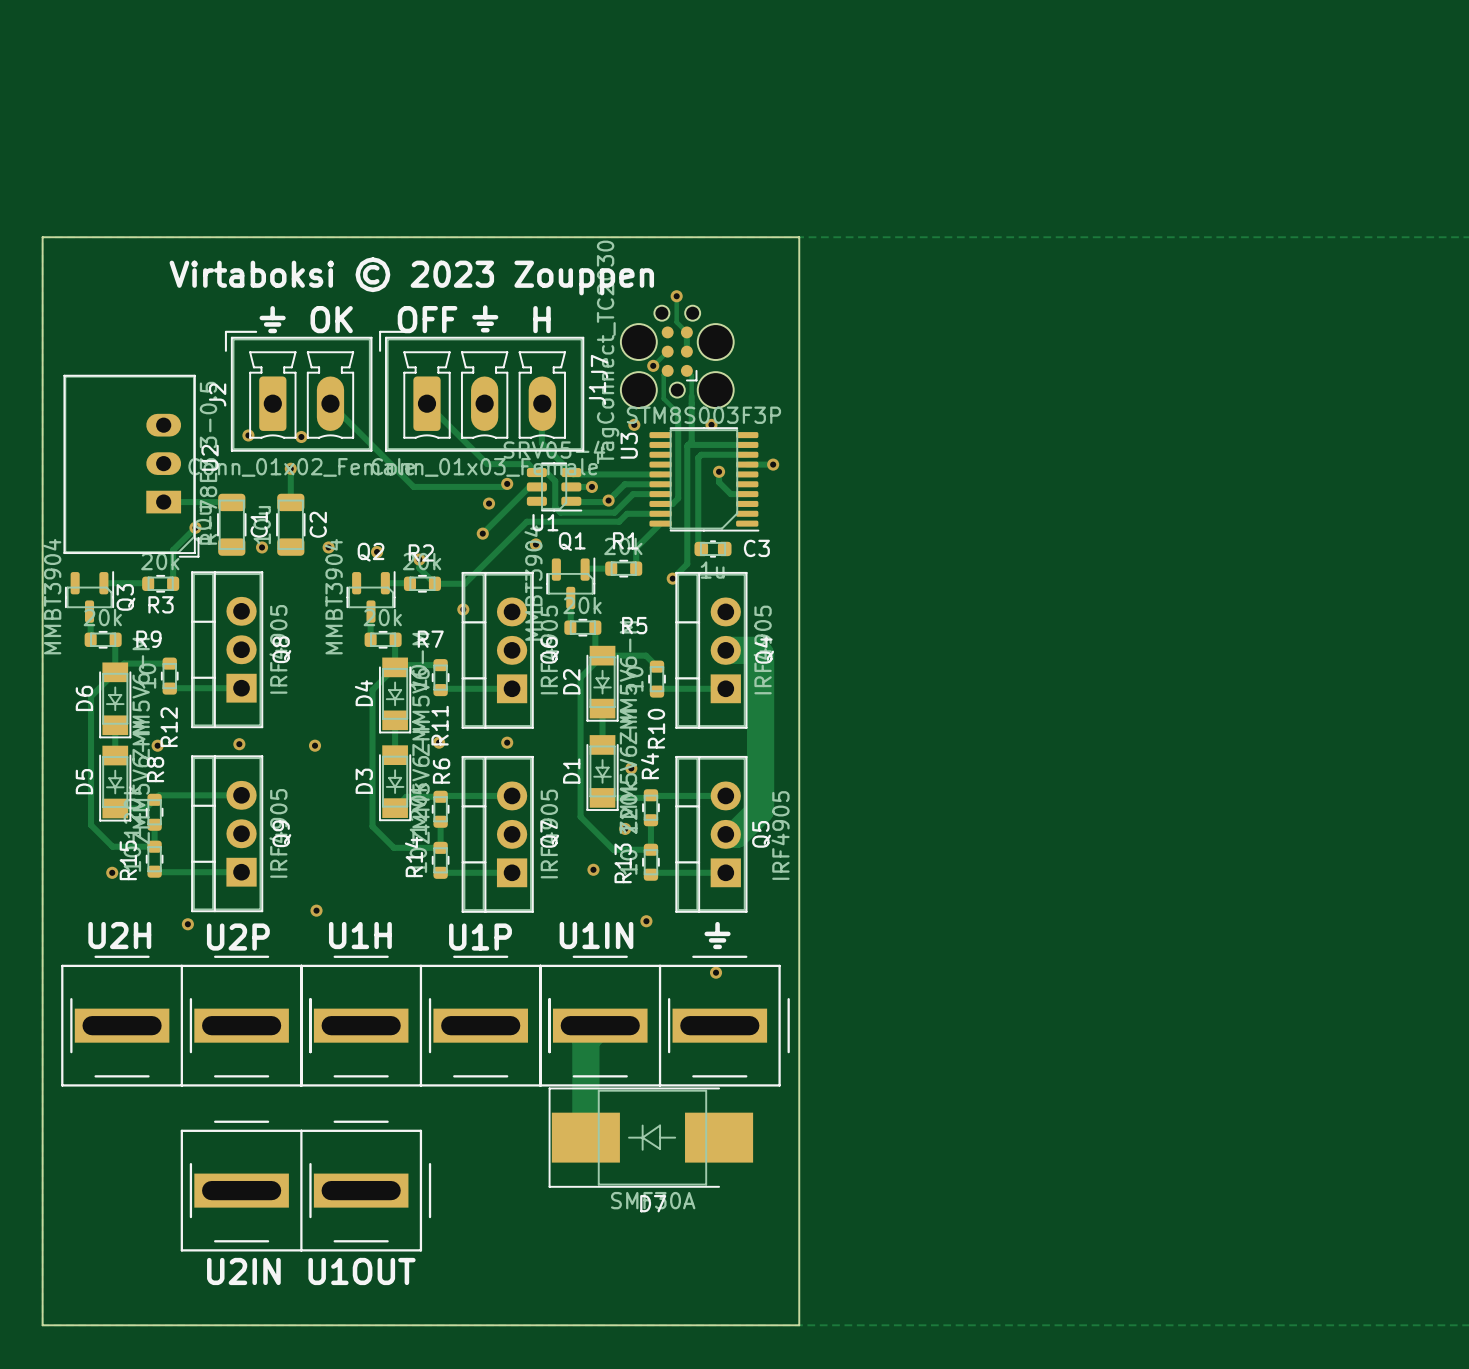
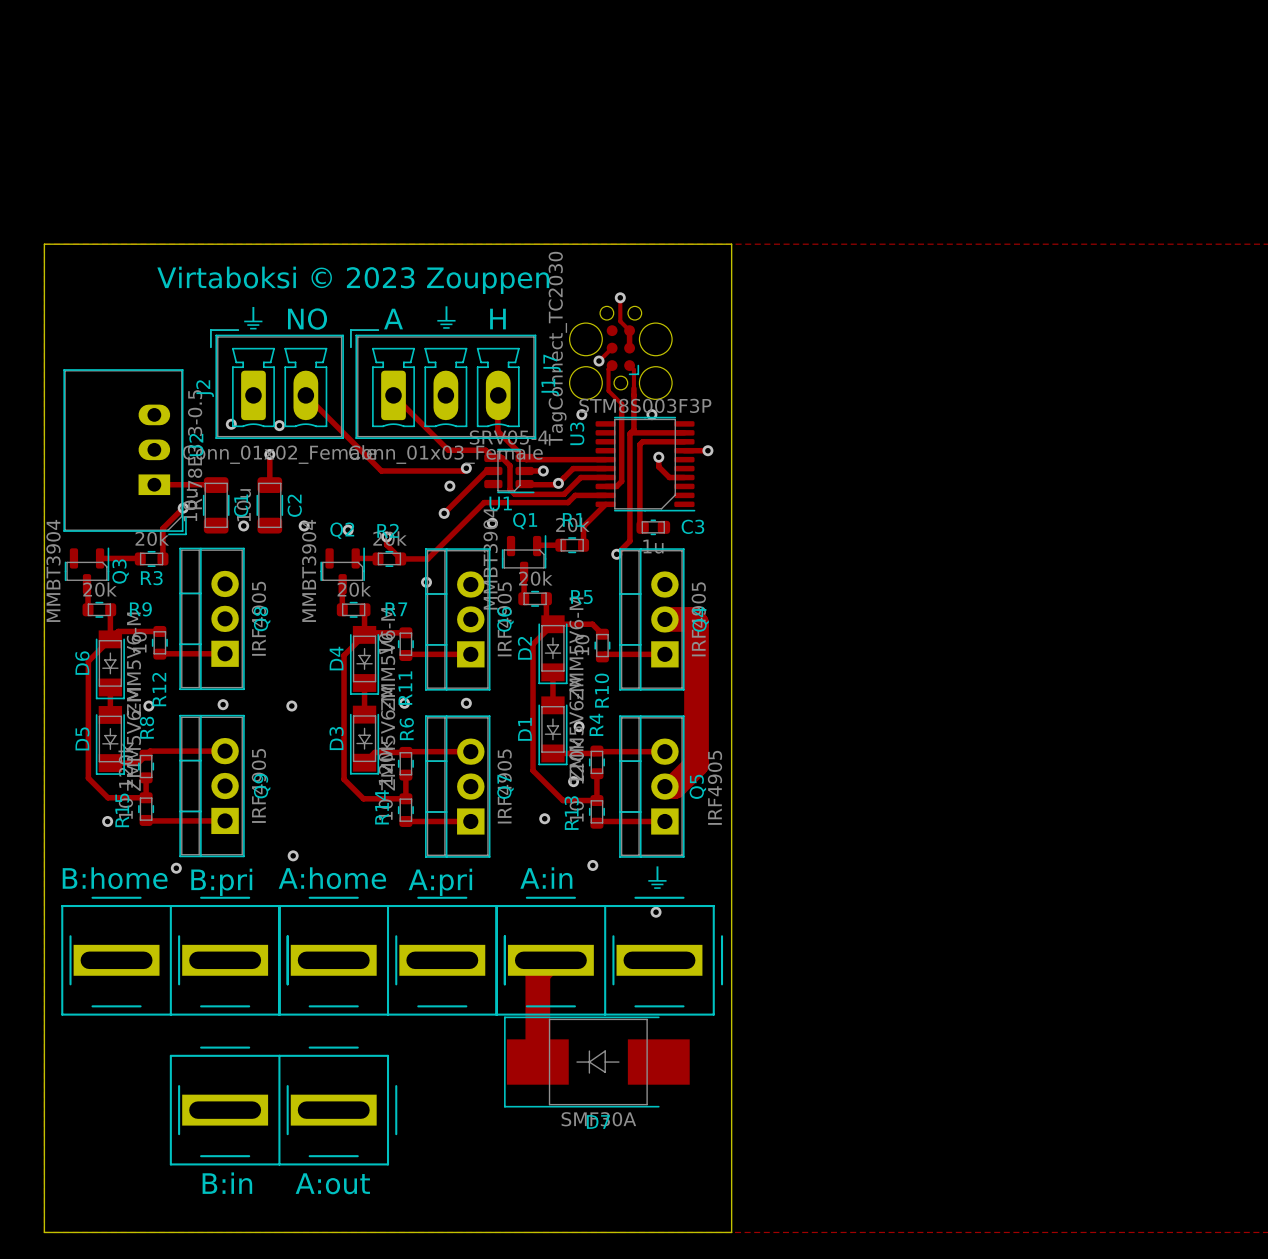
text: OK (331, 319) -> NO (307, 319)
text: OFF (427, 319) -> A (393, 319)
text: U2H (119, 935) -> B:home (115, 878)
text: U1H (360, 935) -> A:home (332, 878)
text: U1IN (596, 935) -> A:in (546, 878)
text: U2P (238, 937) -> B:pri (221, 882)
text: U1P (480, 937) -> A:pri (440, 882)
text: U2IN (243, 1271) -> B:in (227, 1183)
text: U1OUT (362, 1271) -> A:out (332, 1183)

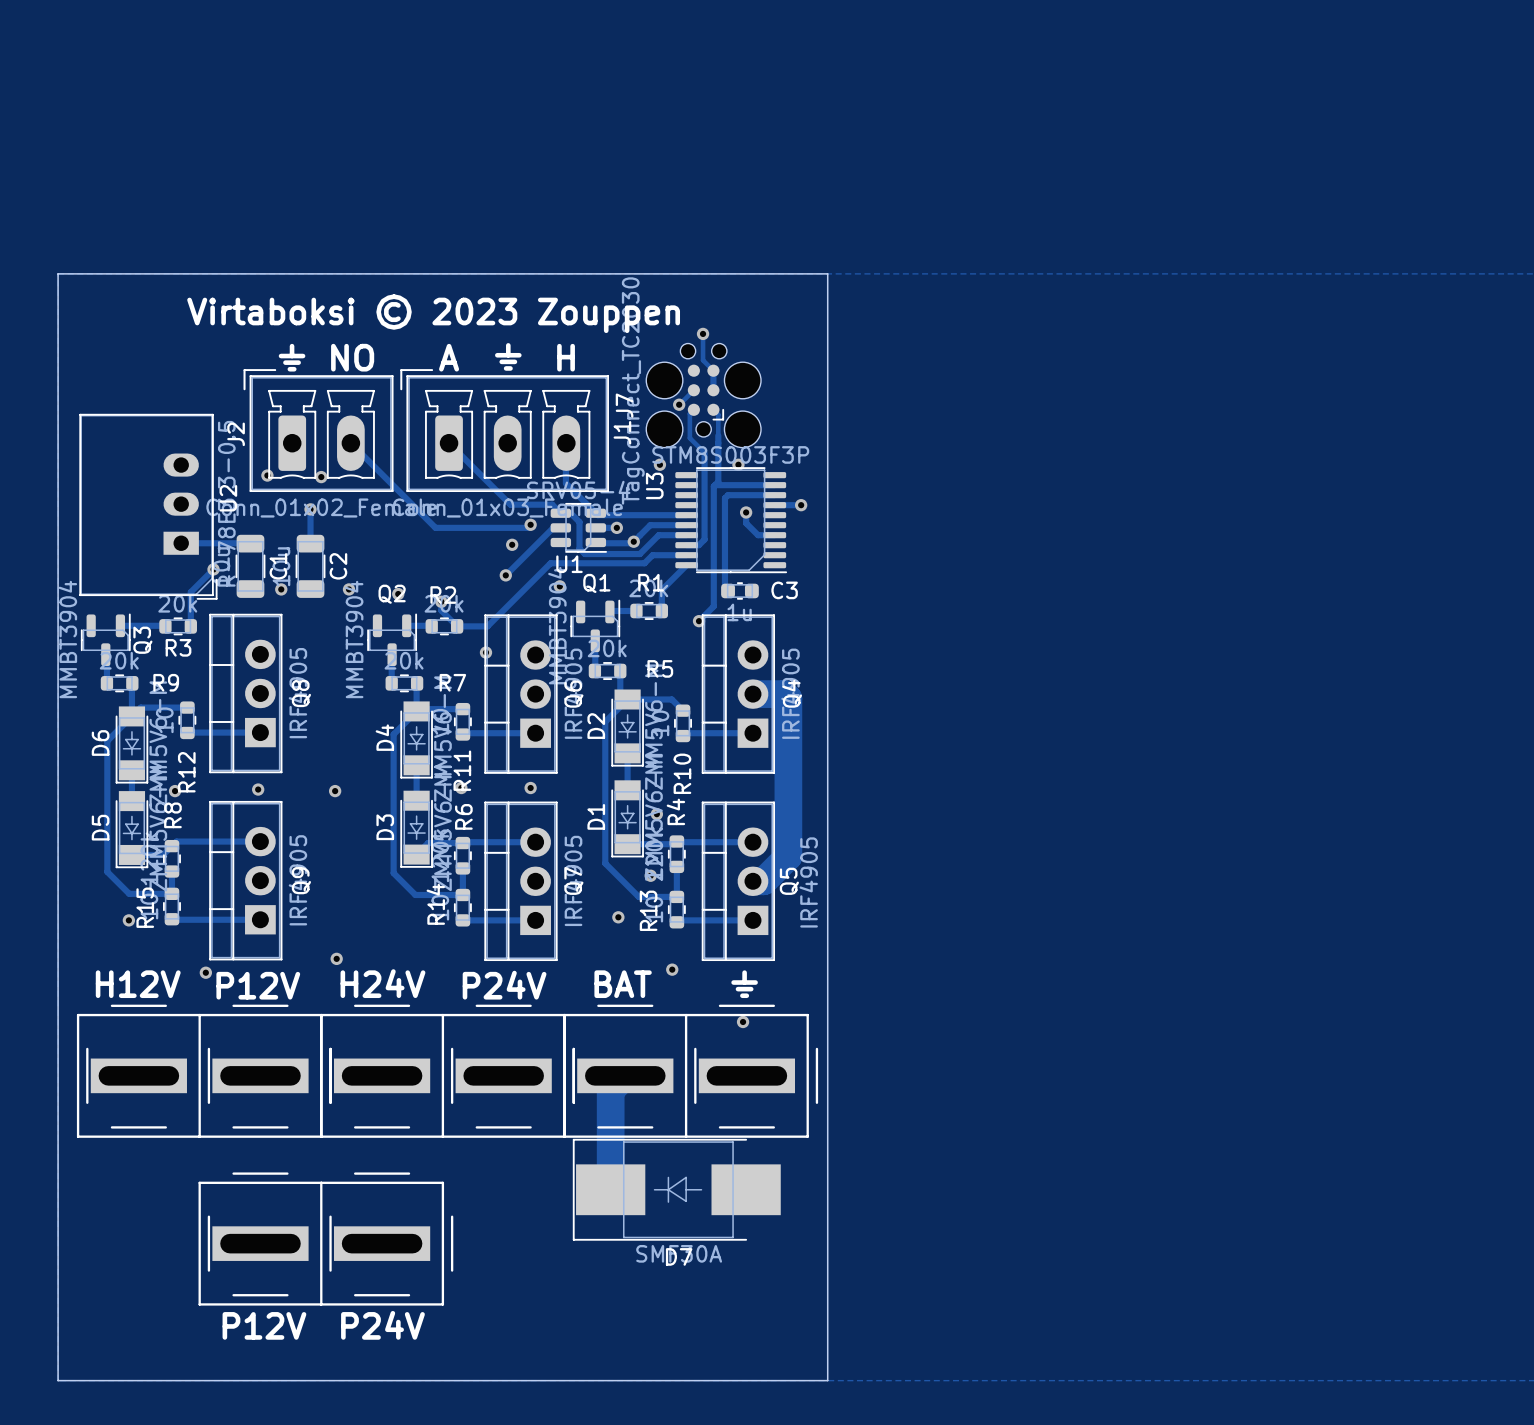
text: B:home (115, 878) -> H12V (138, 984)
text: A:home (332, 878) -> H24V (382, 983)
text: A:in (546, 878) -> BAT (623, 984)
text: B:pri (221, 882) -> P12V (258, 985)
text: A:pri (440, 882) -> P24V (504, 985)
text: B:in (227, 1183) -> P12V (264, 1325)
text: A:out (332, 1183) -> P24V (382, 1325)

